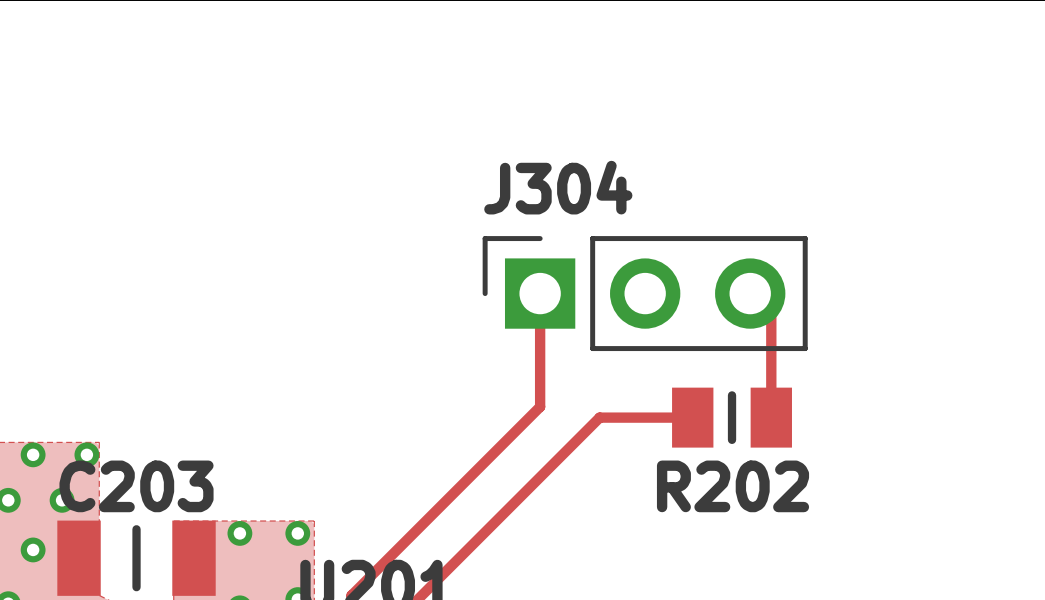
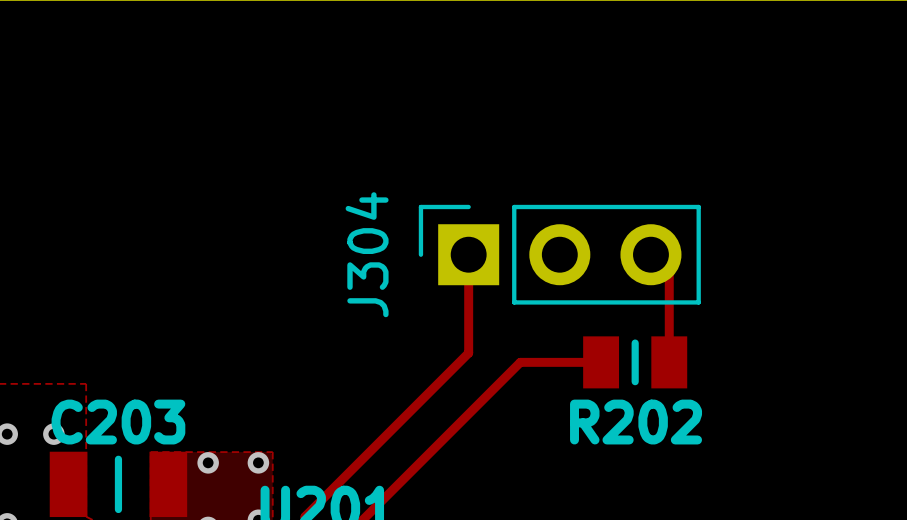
J304 name rotation: 0° (558, 187) -> 90° counterclockwise (367, 254)
via: (33, 454) -> none
via: (86, 454) -> none
via: (33, 549) -> none

